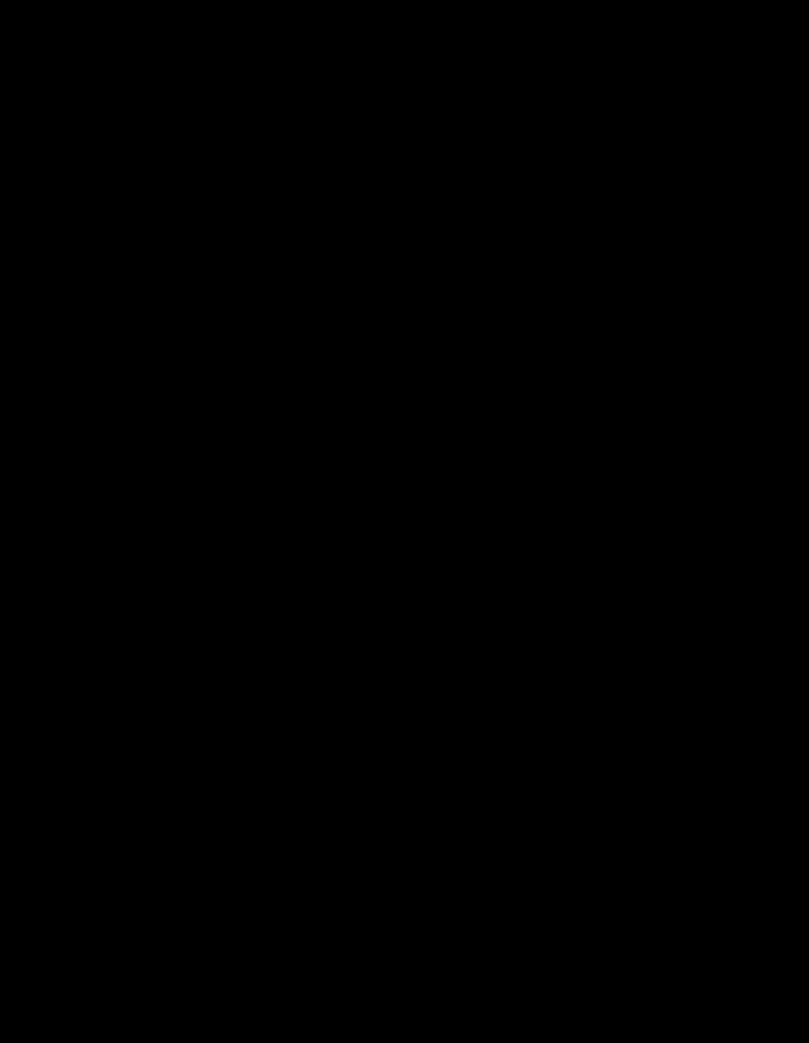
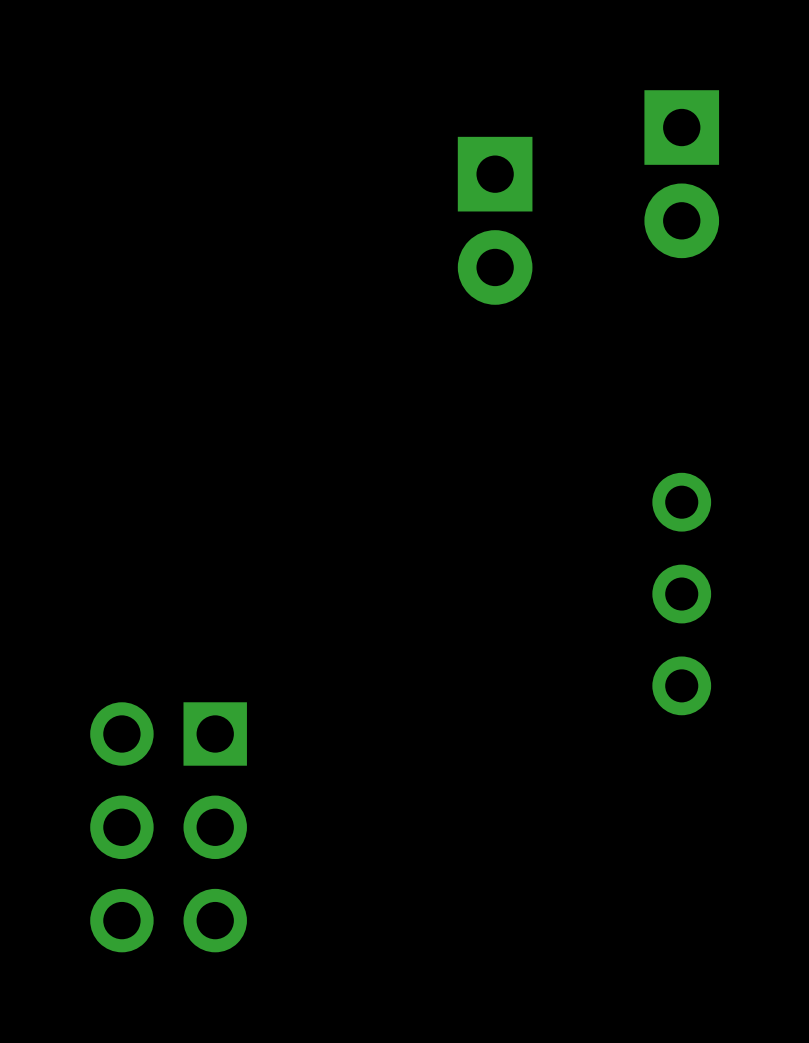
part: none -> (681, 174)
part: none -> (495, 220)
part: none -> (681, 594)
part: none -> (168, 827)

